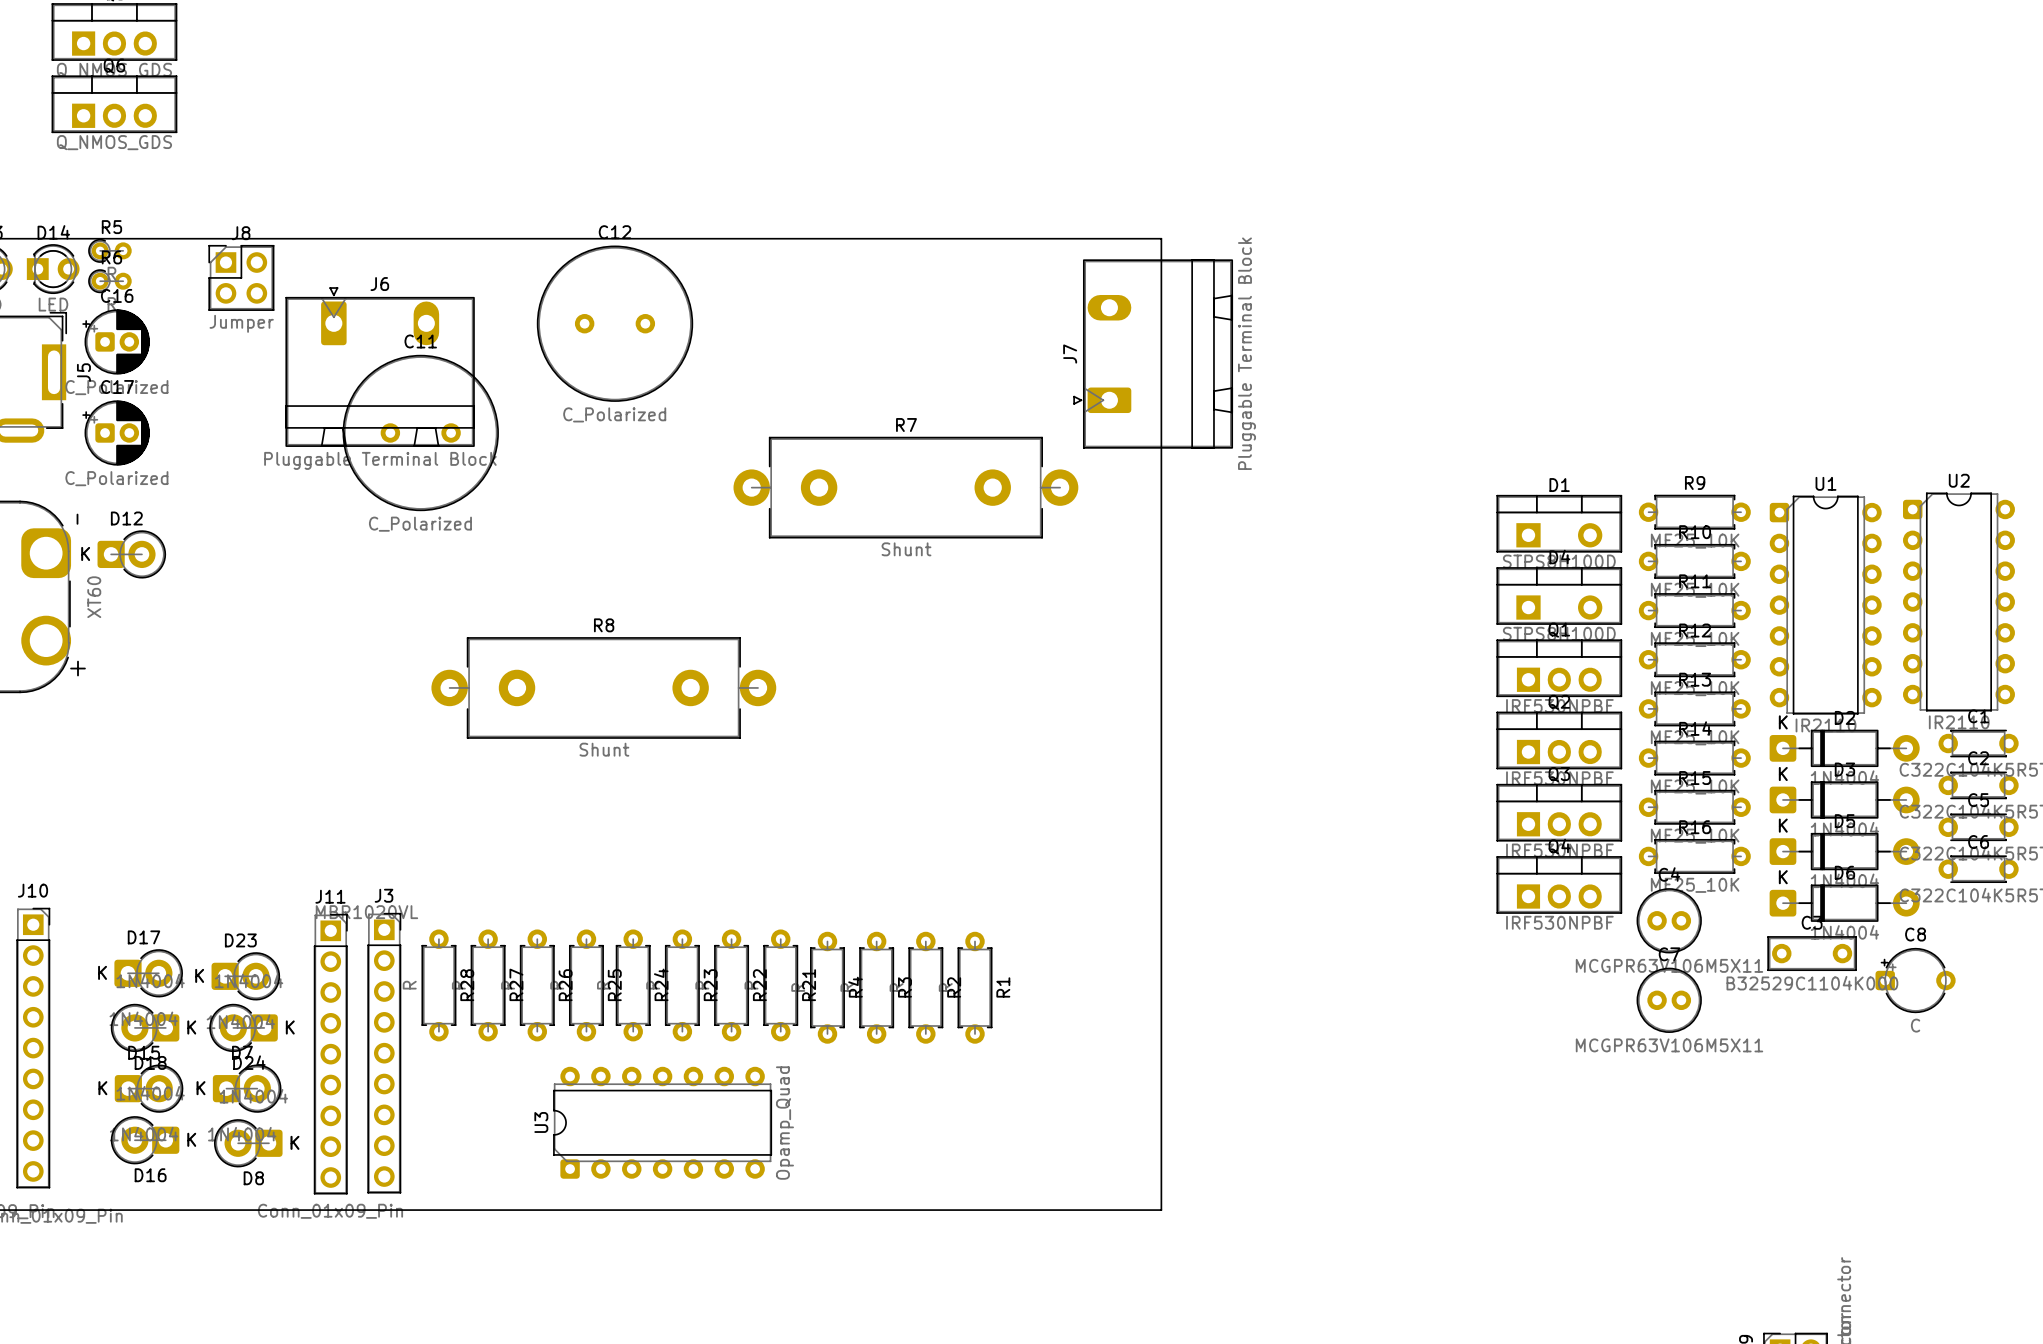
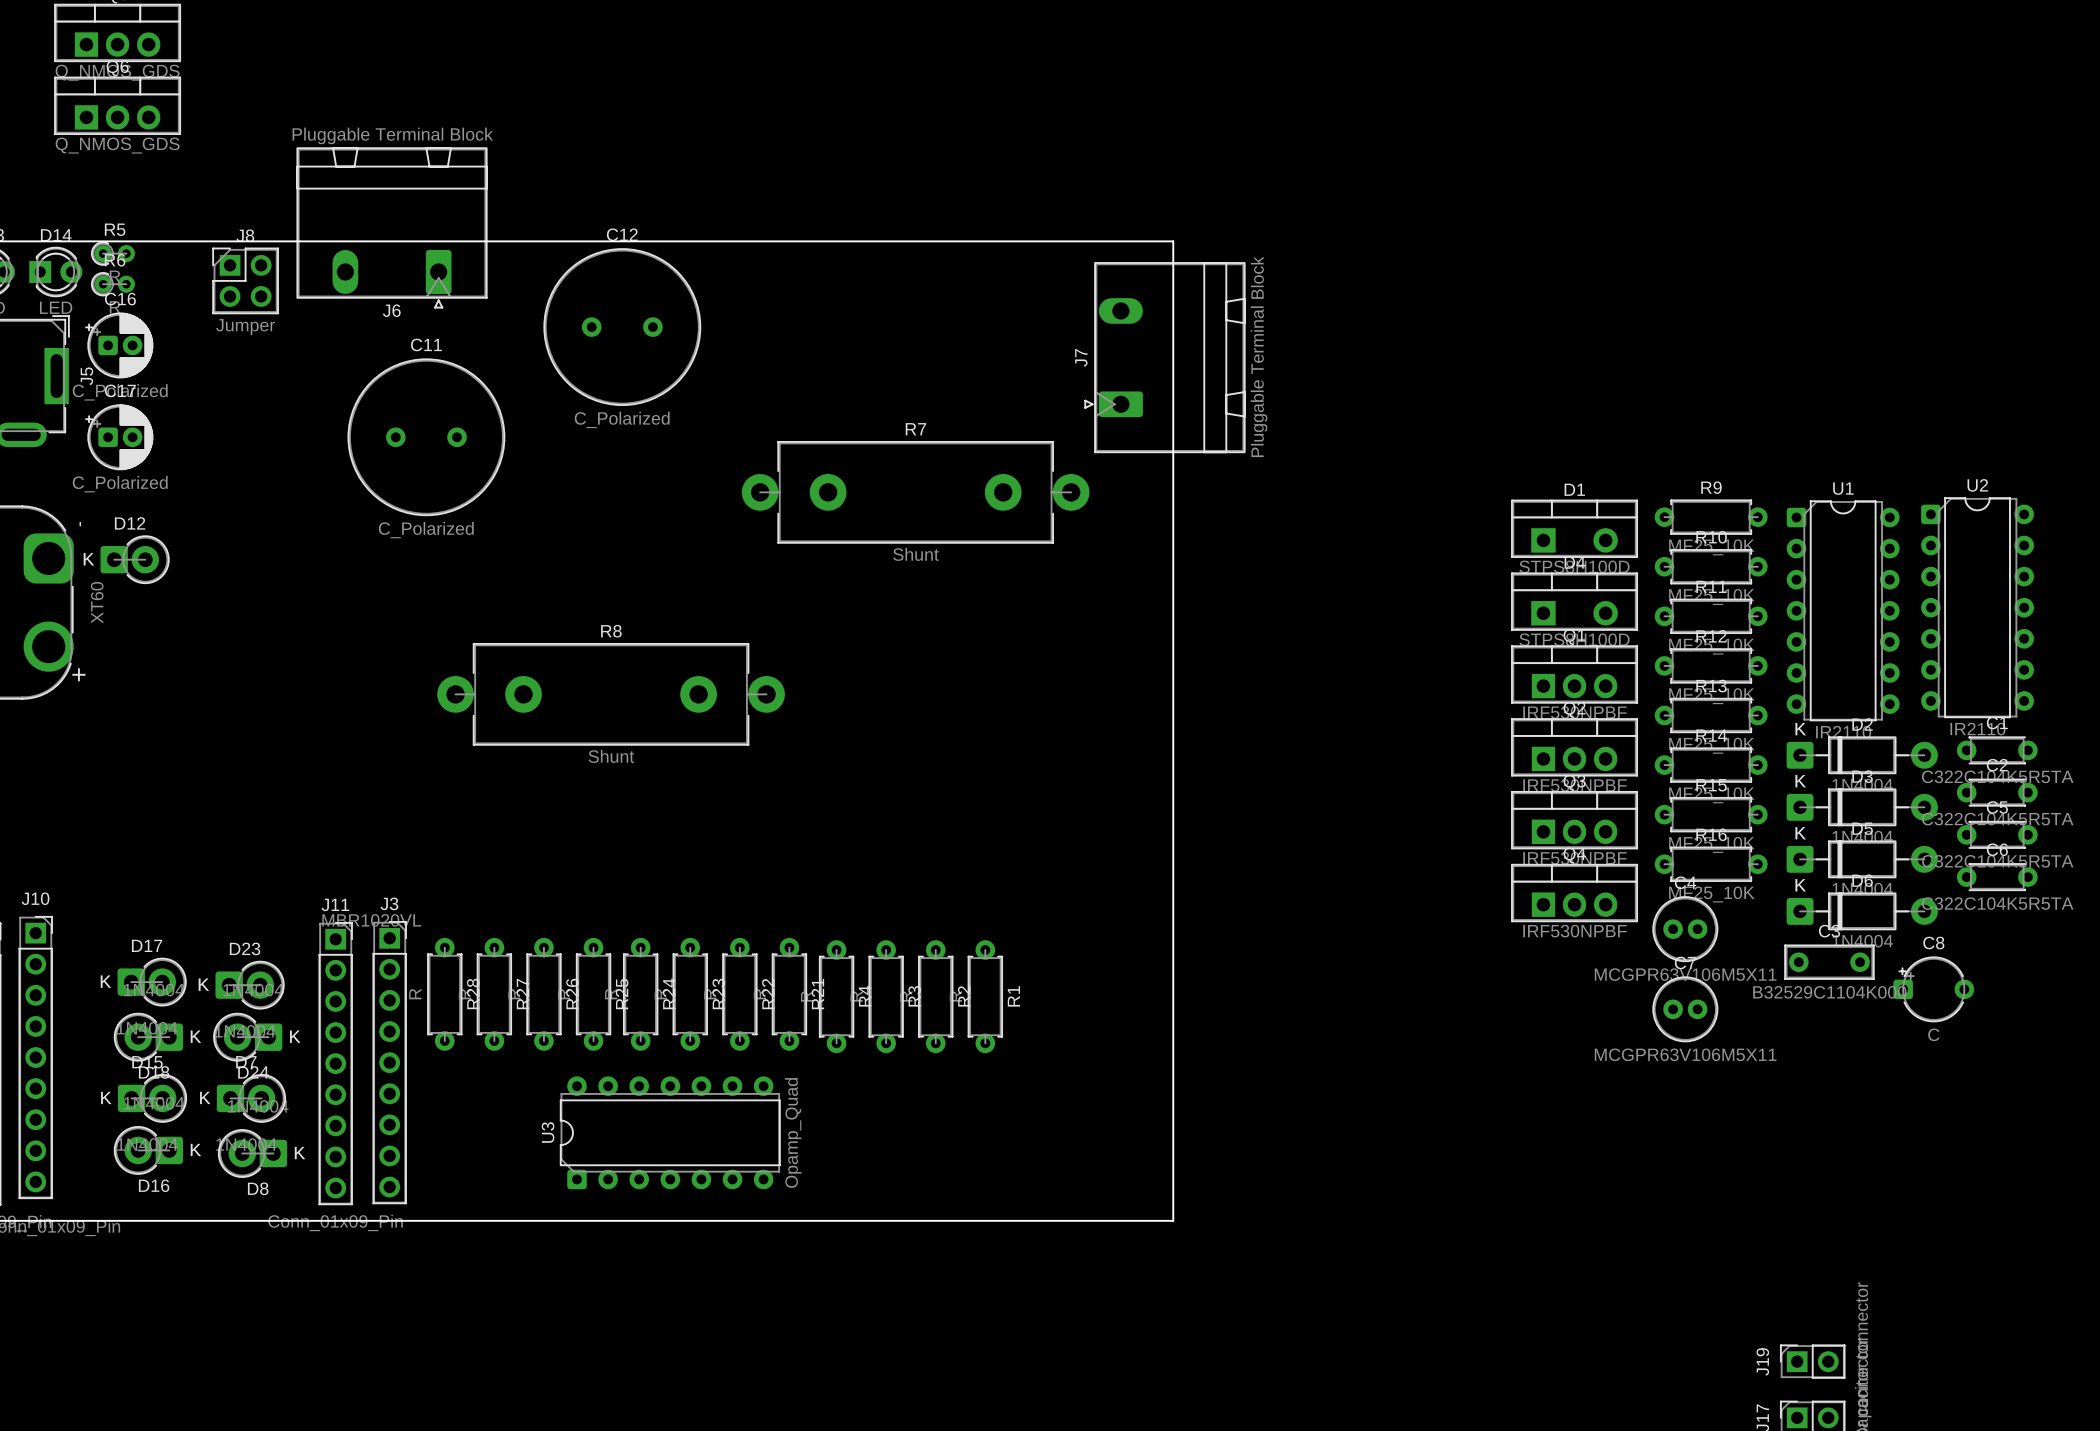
J6 rotation: 0° (380, 367) -> 180° (392, 227)
J6 position: (380, 367) -> (392, 227)

